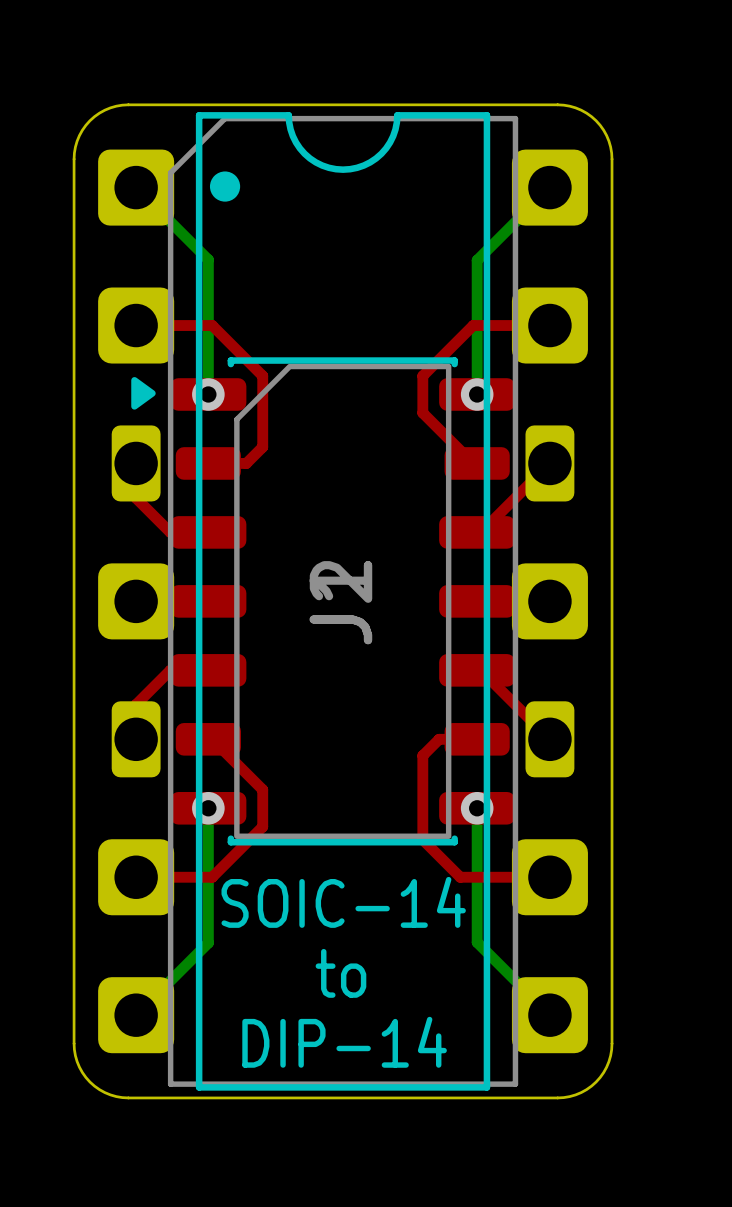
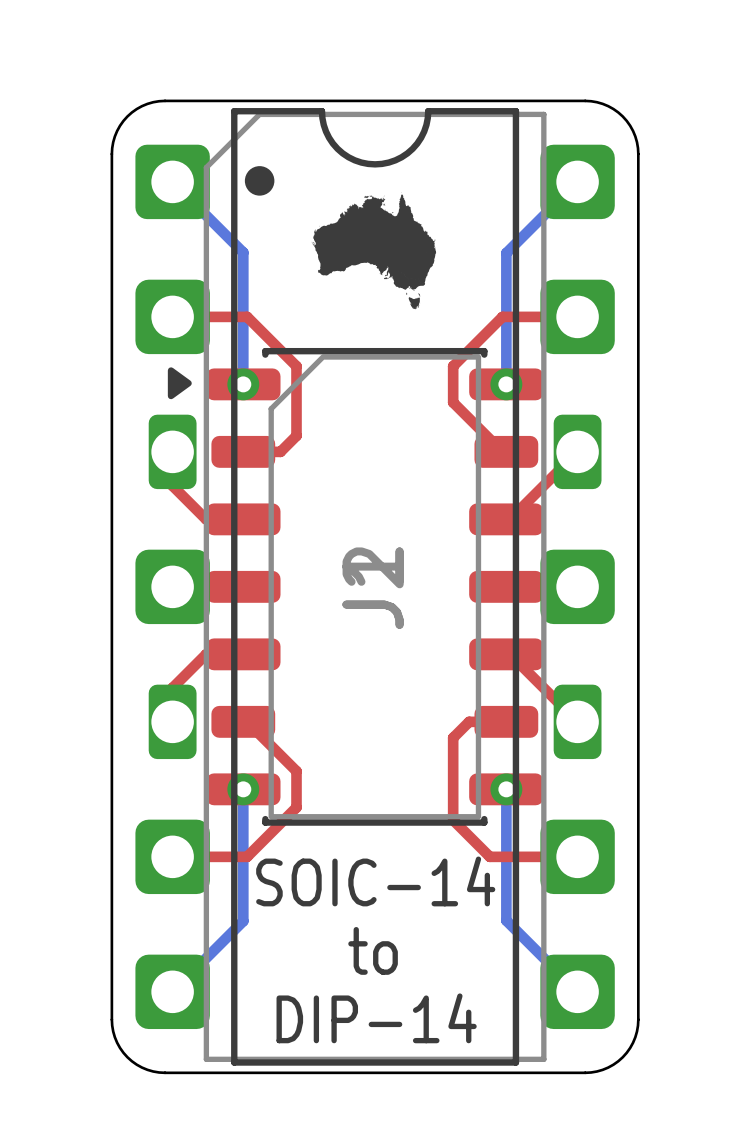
drawing: none -> [311, 192, 437, 310]

